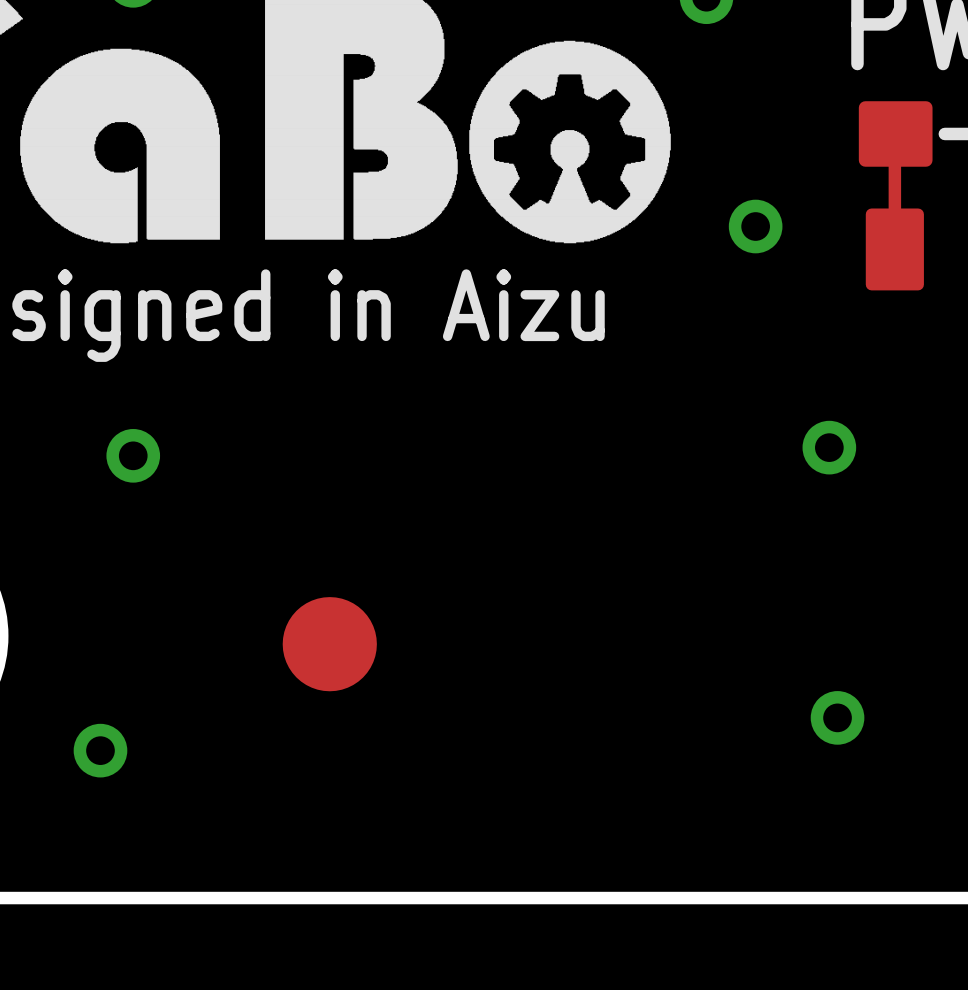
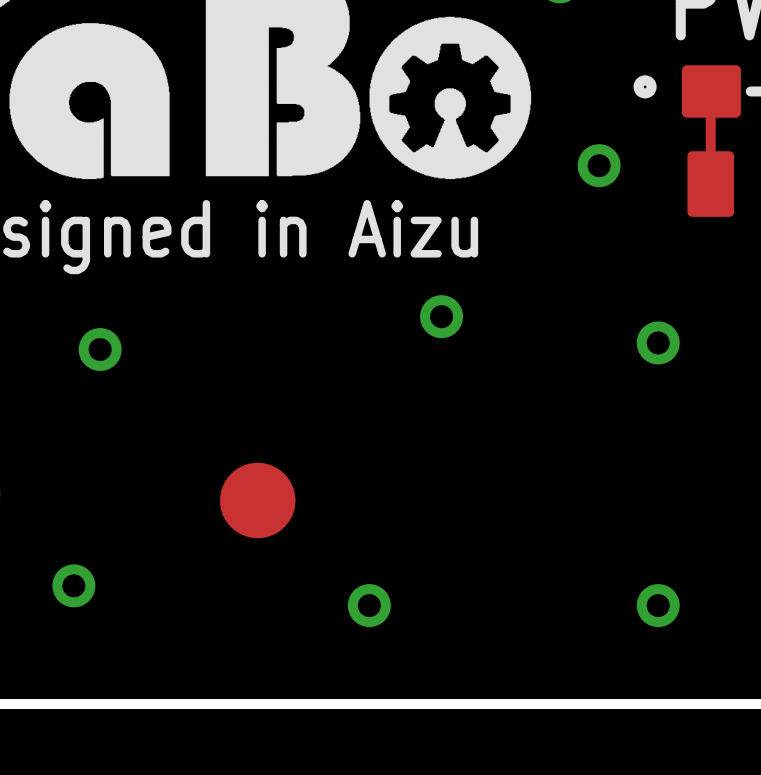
drawing: none -> [633, 75, 657, 99]
via: none -> (441, 316)
via position: (837, 717) -> (658, 605)
via: none -> (369, 605)

